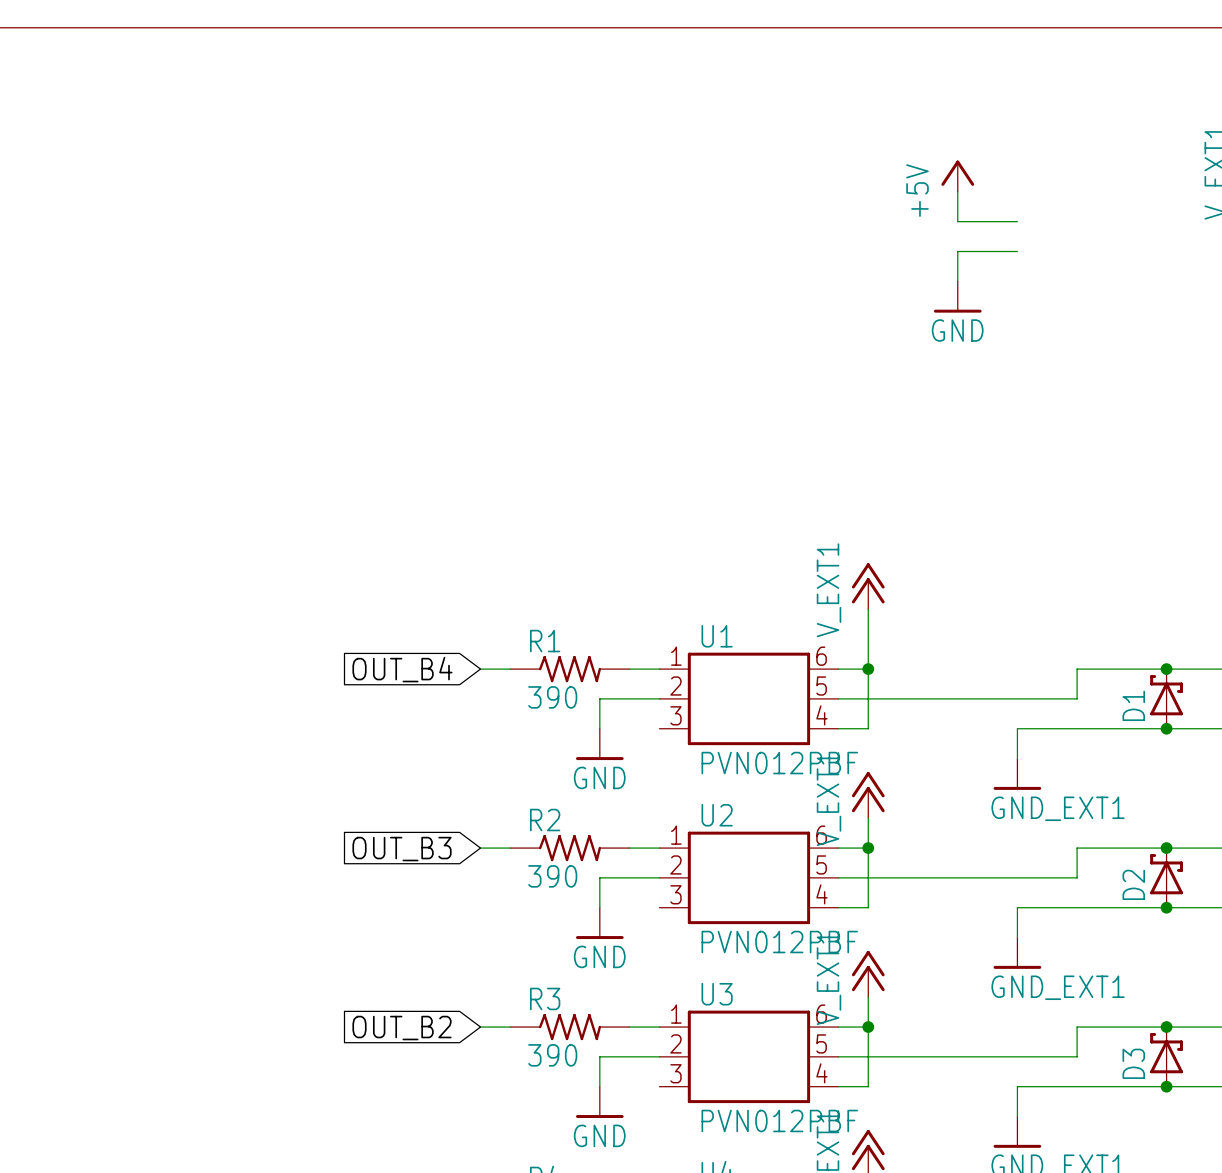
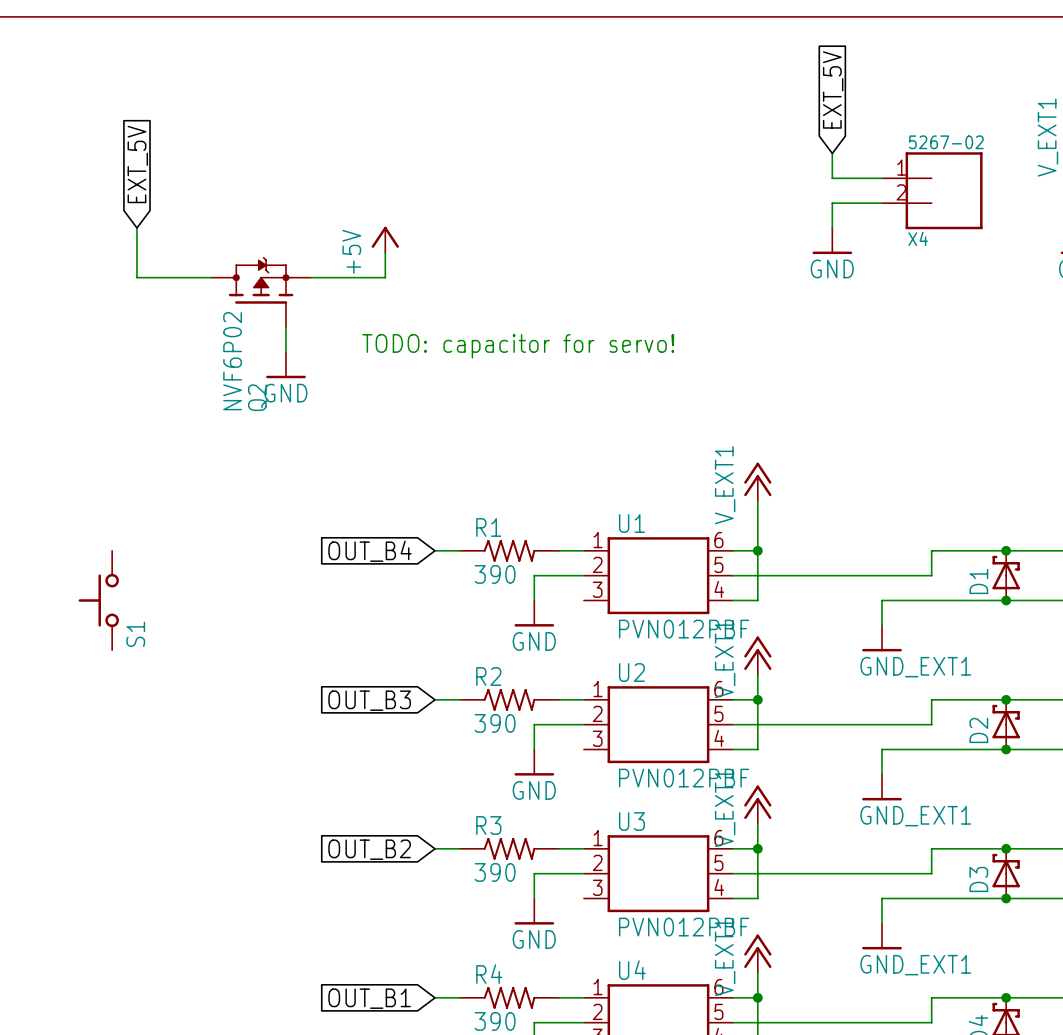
global label: none -> EXT_5V (833, 89)
power symbol: +5V (957, 176) -> none
global label: none -> EXT_5V (137, 164)
X4: none -> 5267-02 (932, 190)
wire: none -> (136, 227) (136, 277) (211, 277)
power symbol: none -> +5V (385, 239)
wire: none -> (385, 252) (385, 277) (310, 277)
Q2: none -> NVF6P02 (261, 292)
wire: none -> (285, 327) (285, 352)
text: none -> TODO: capacitor for servo! (518, 346)
power symbol: none -> GND (285, 365)
S1: none -> (98, 600)

